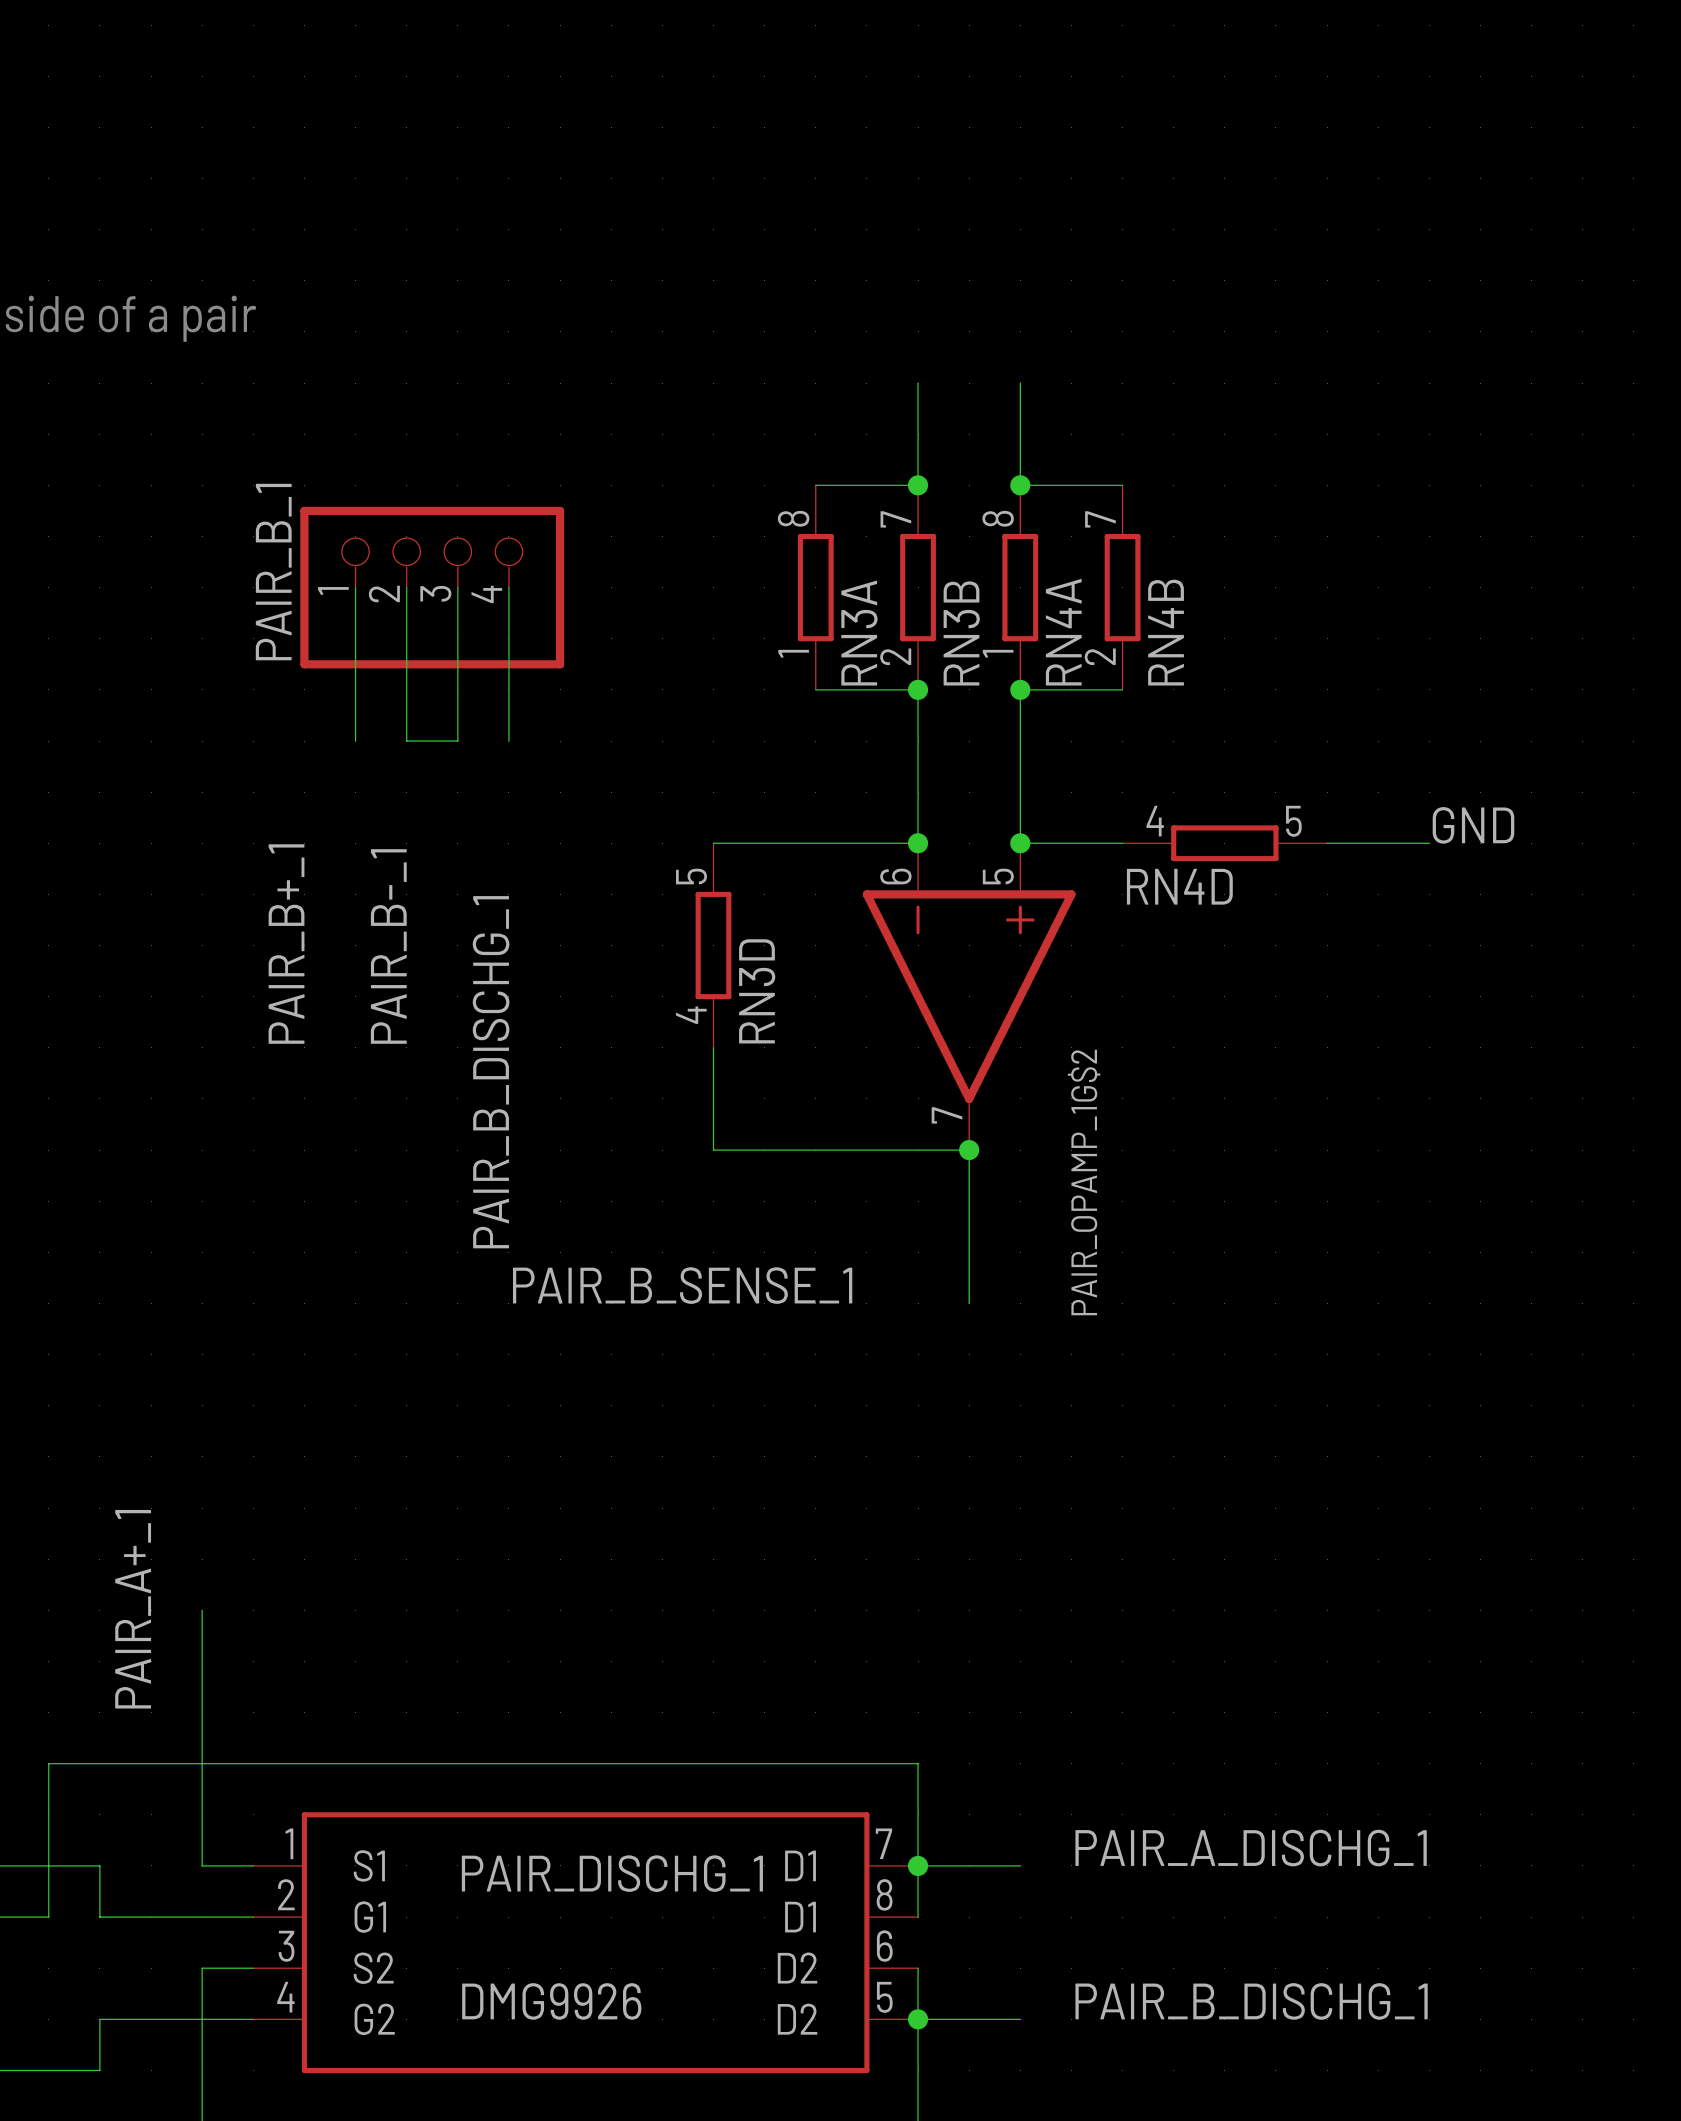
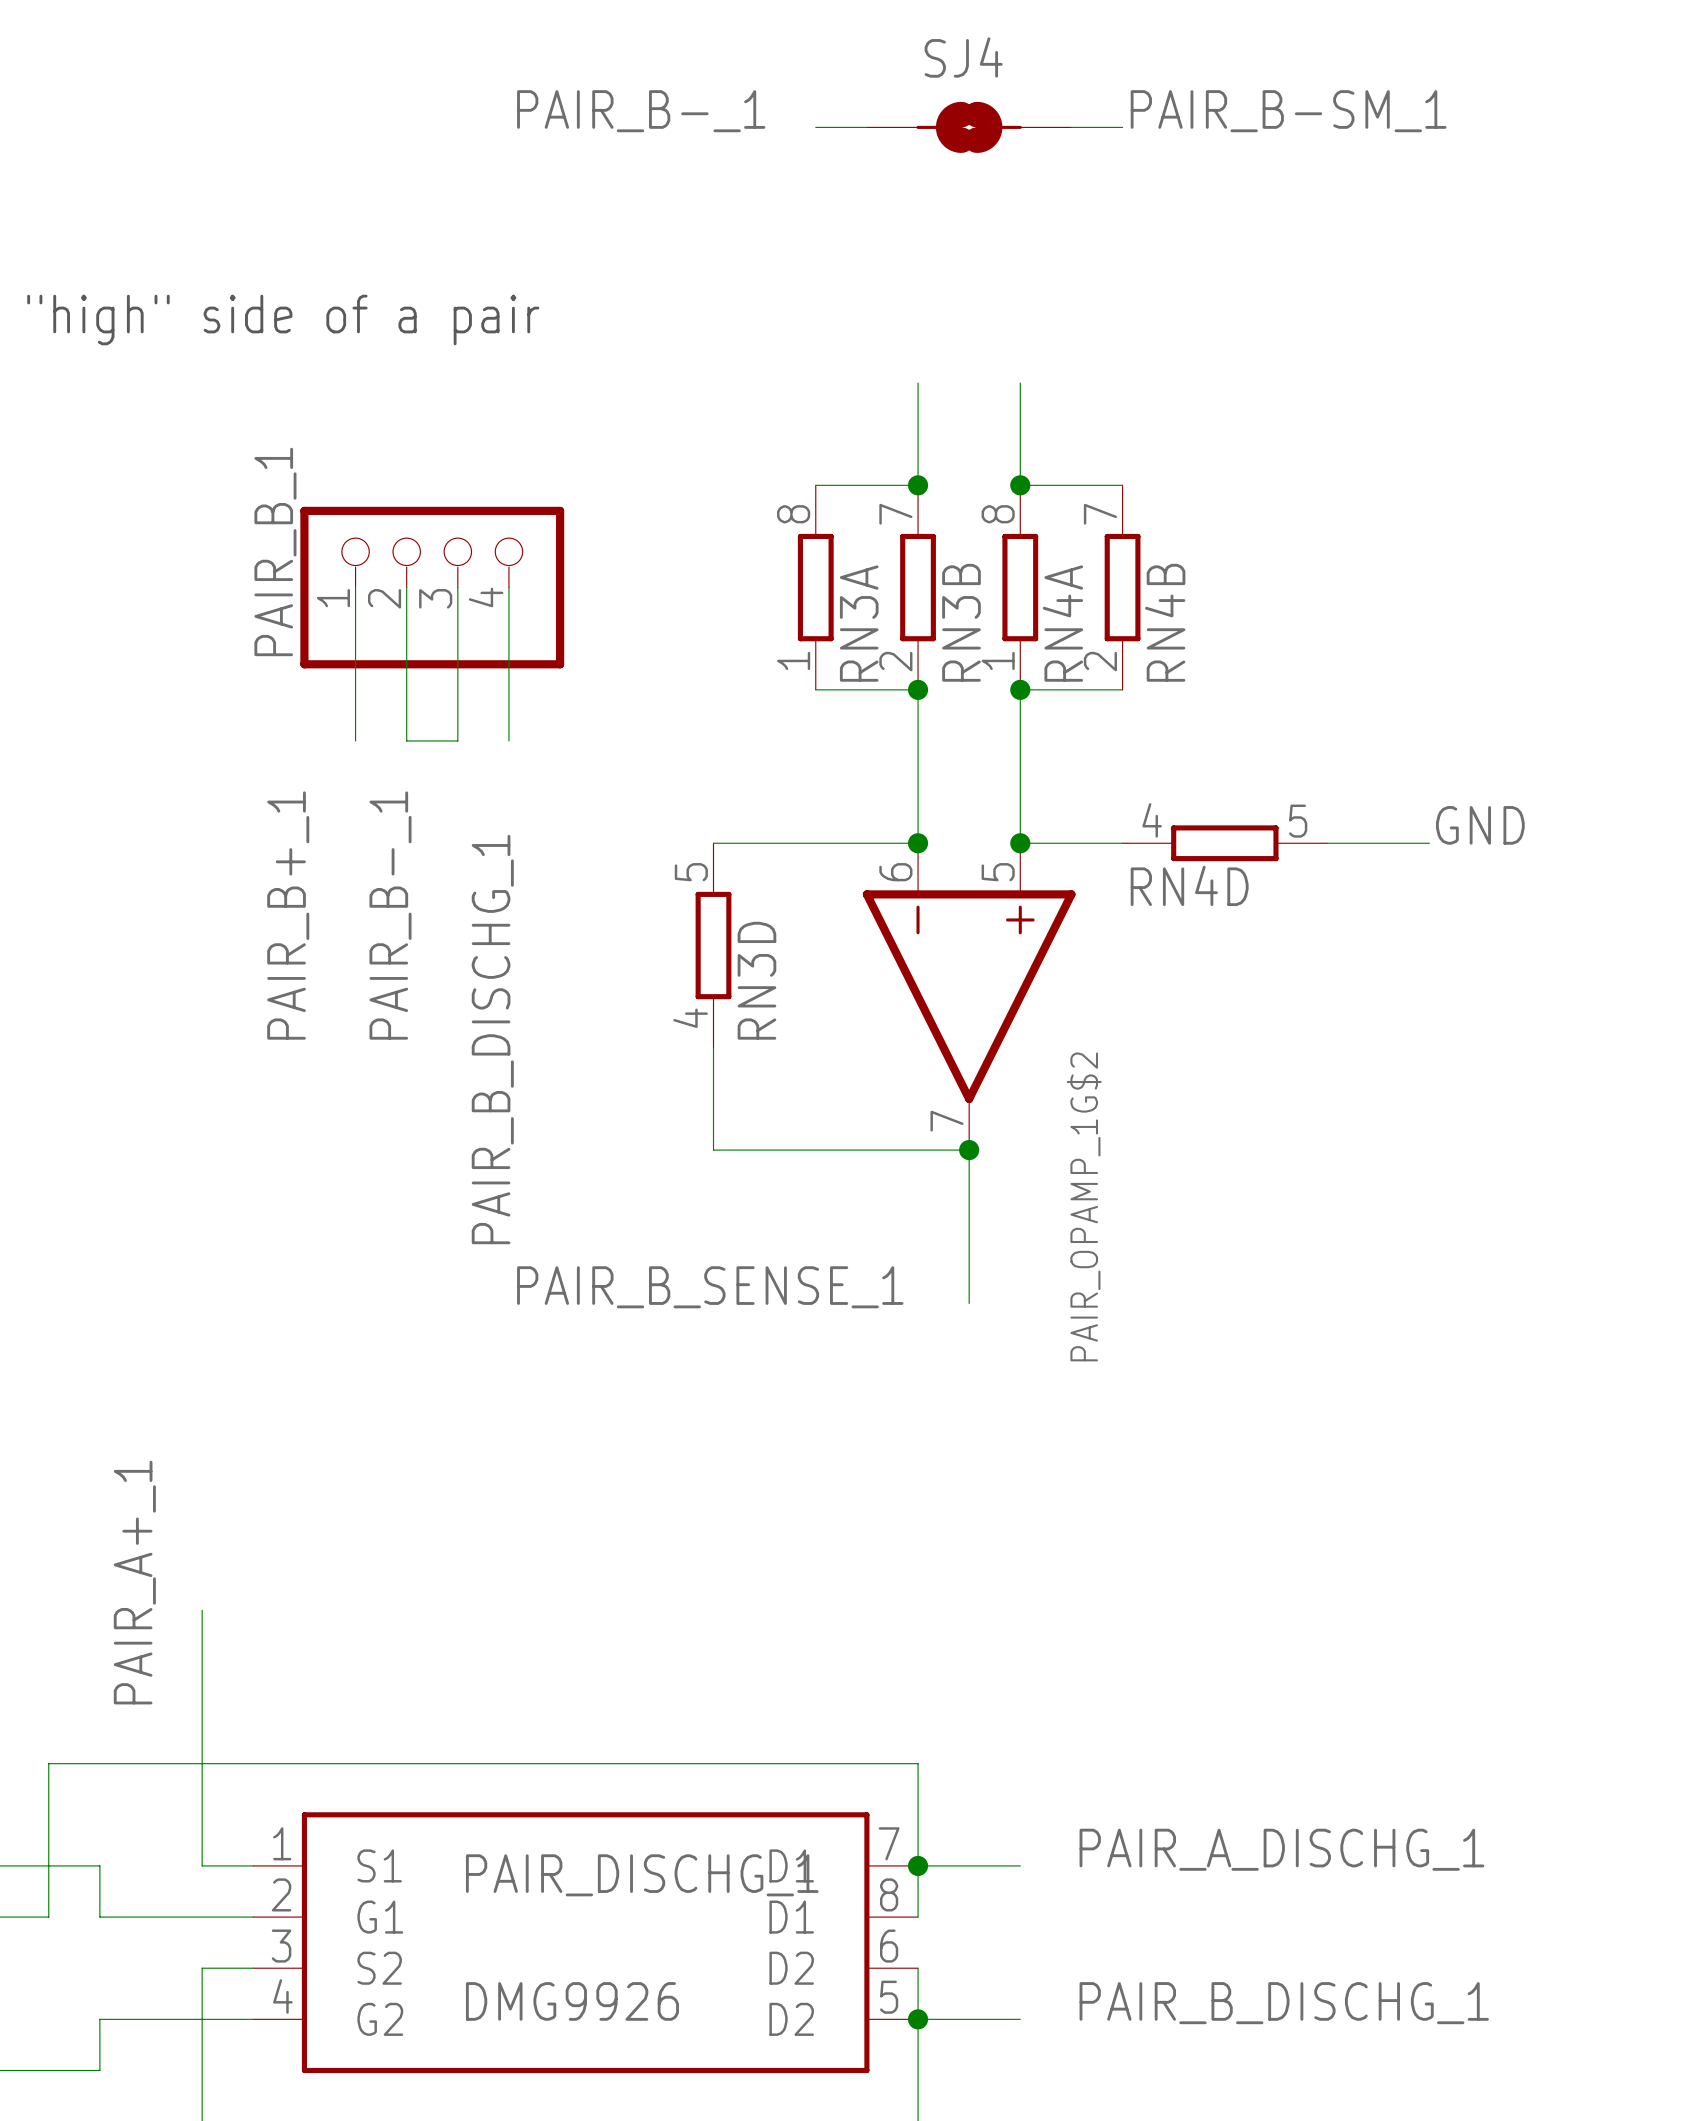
label: none -> PAIR_B-_1 (641, 111)
label: none -> PAIR_B-SM_1 (1288, 111)
wire: none -> (815, 127) (866, 127)
SJ4: none -> (969, 127)
wire: none -> (1071, 127) (1122, 127)

